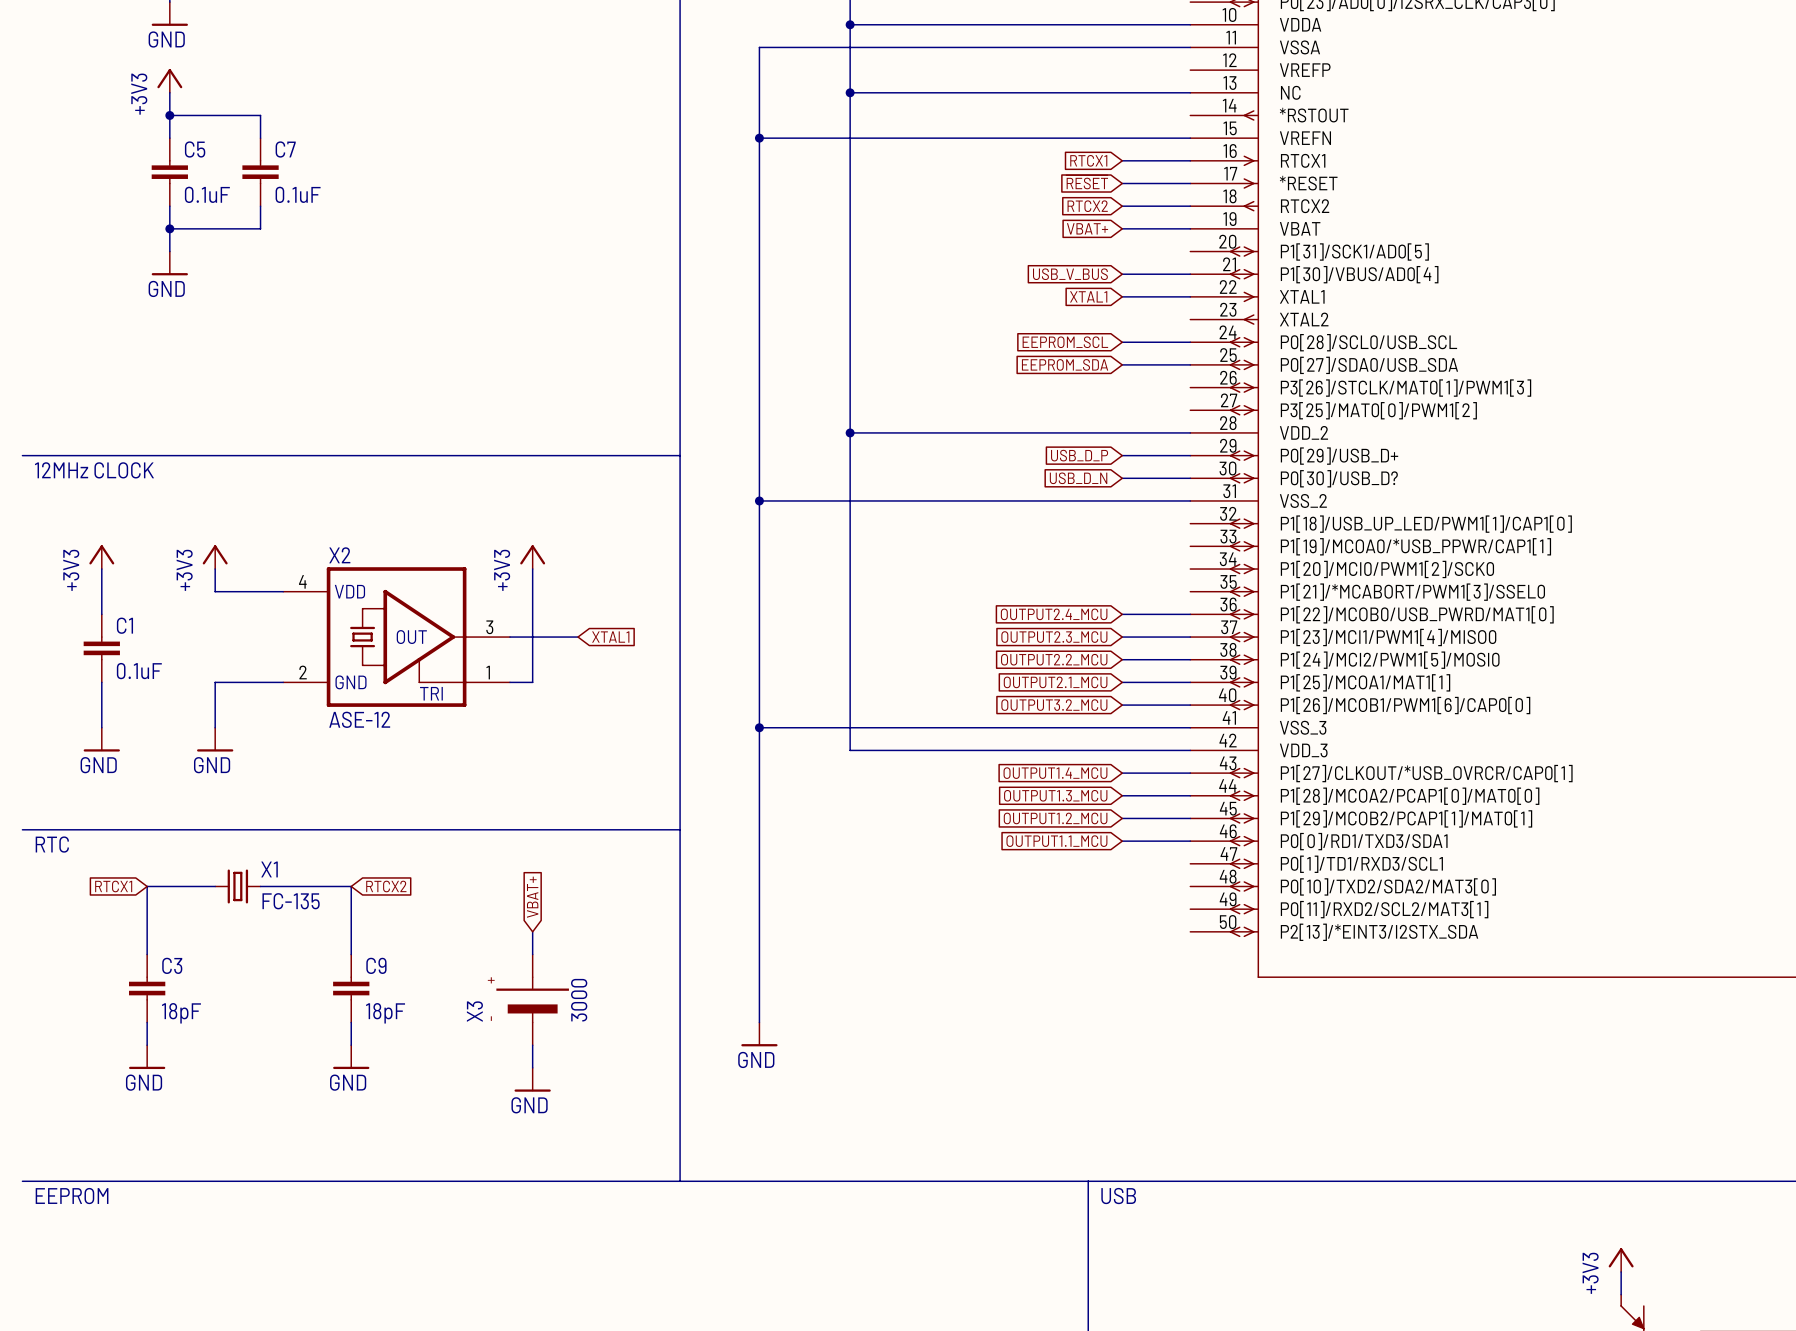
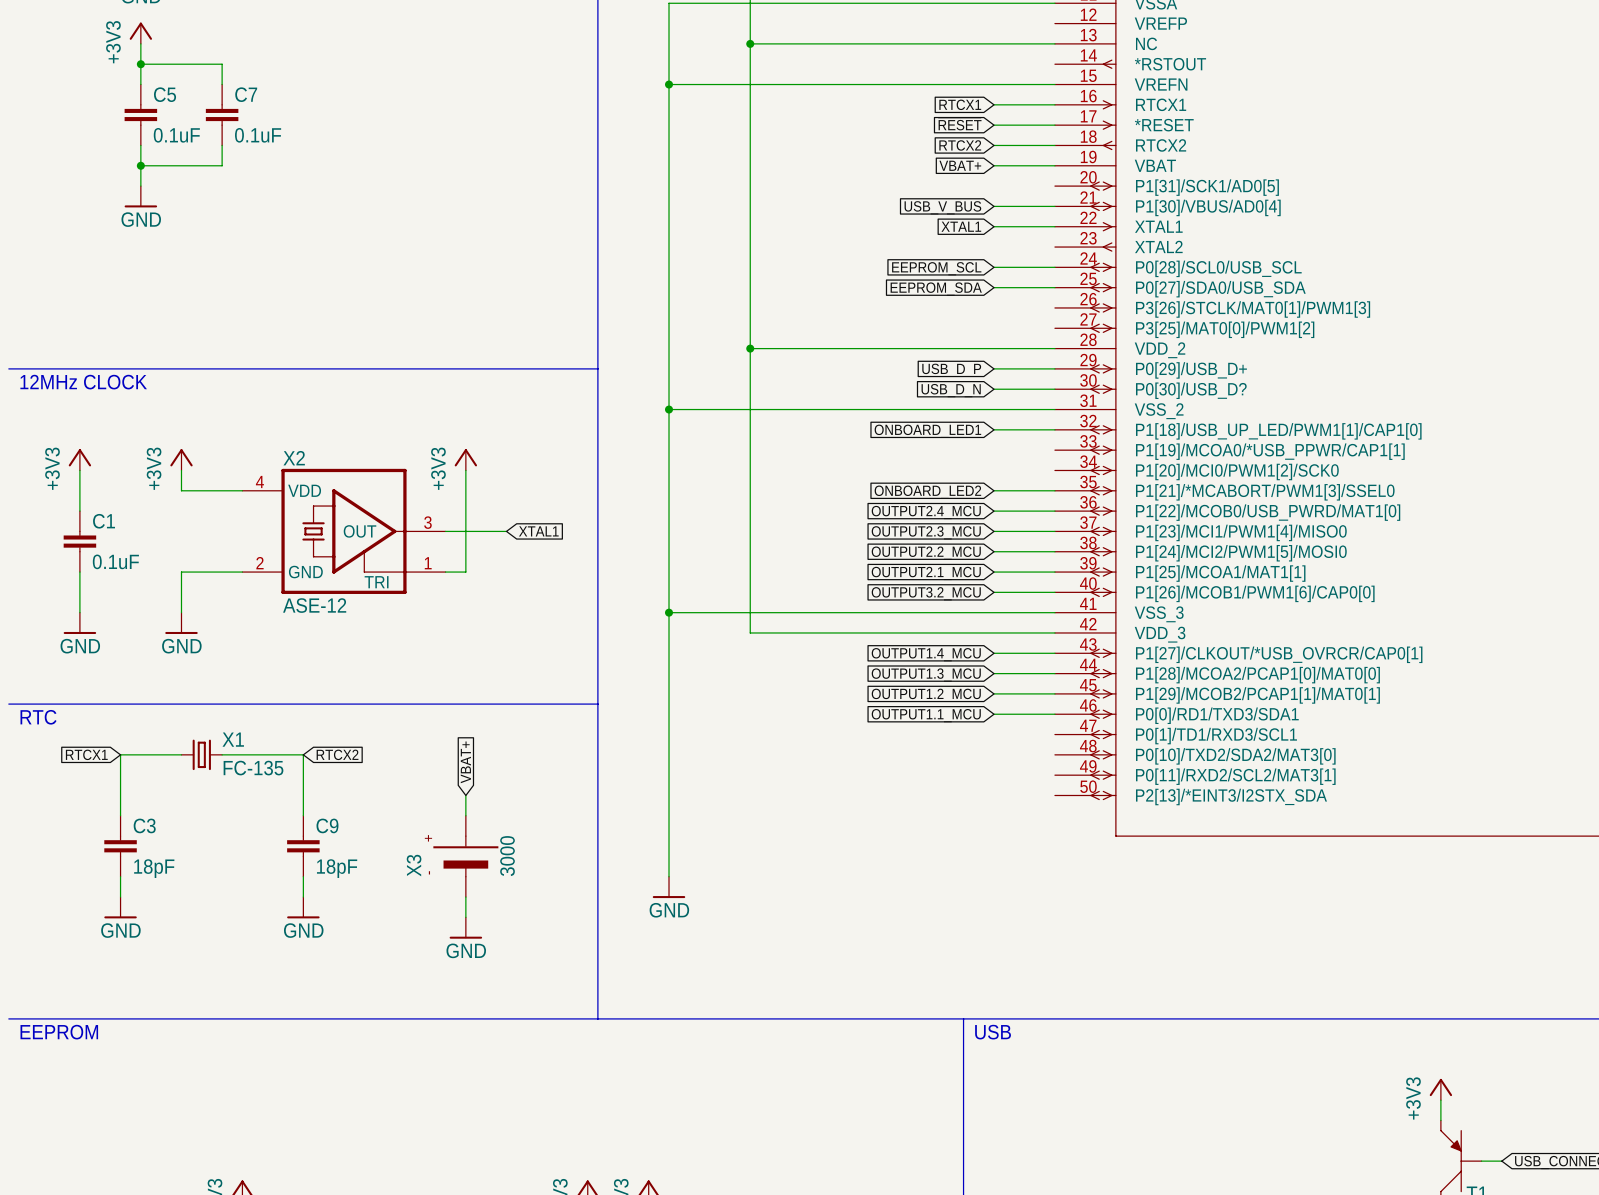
global label: none -> ONBOARD_LED1 (927, 431)
wire: none -> (994, 429) (1054, 429)
global label: none -> ONBOARD_LED2 (927, 492)
wire: none -> (994, 490) (1054, 490)

